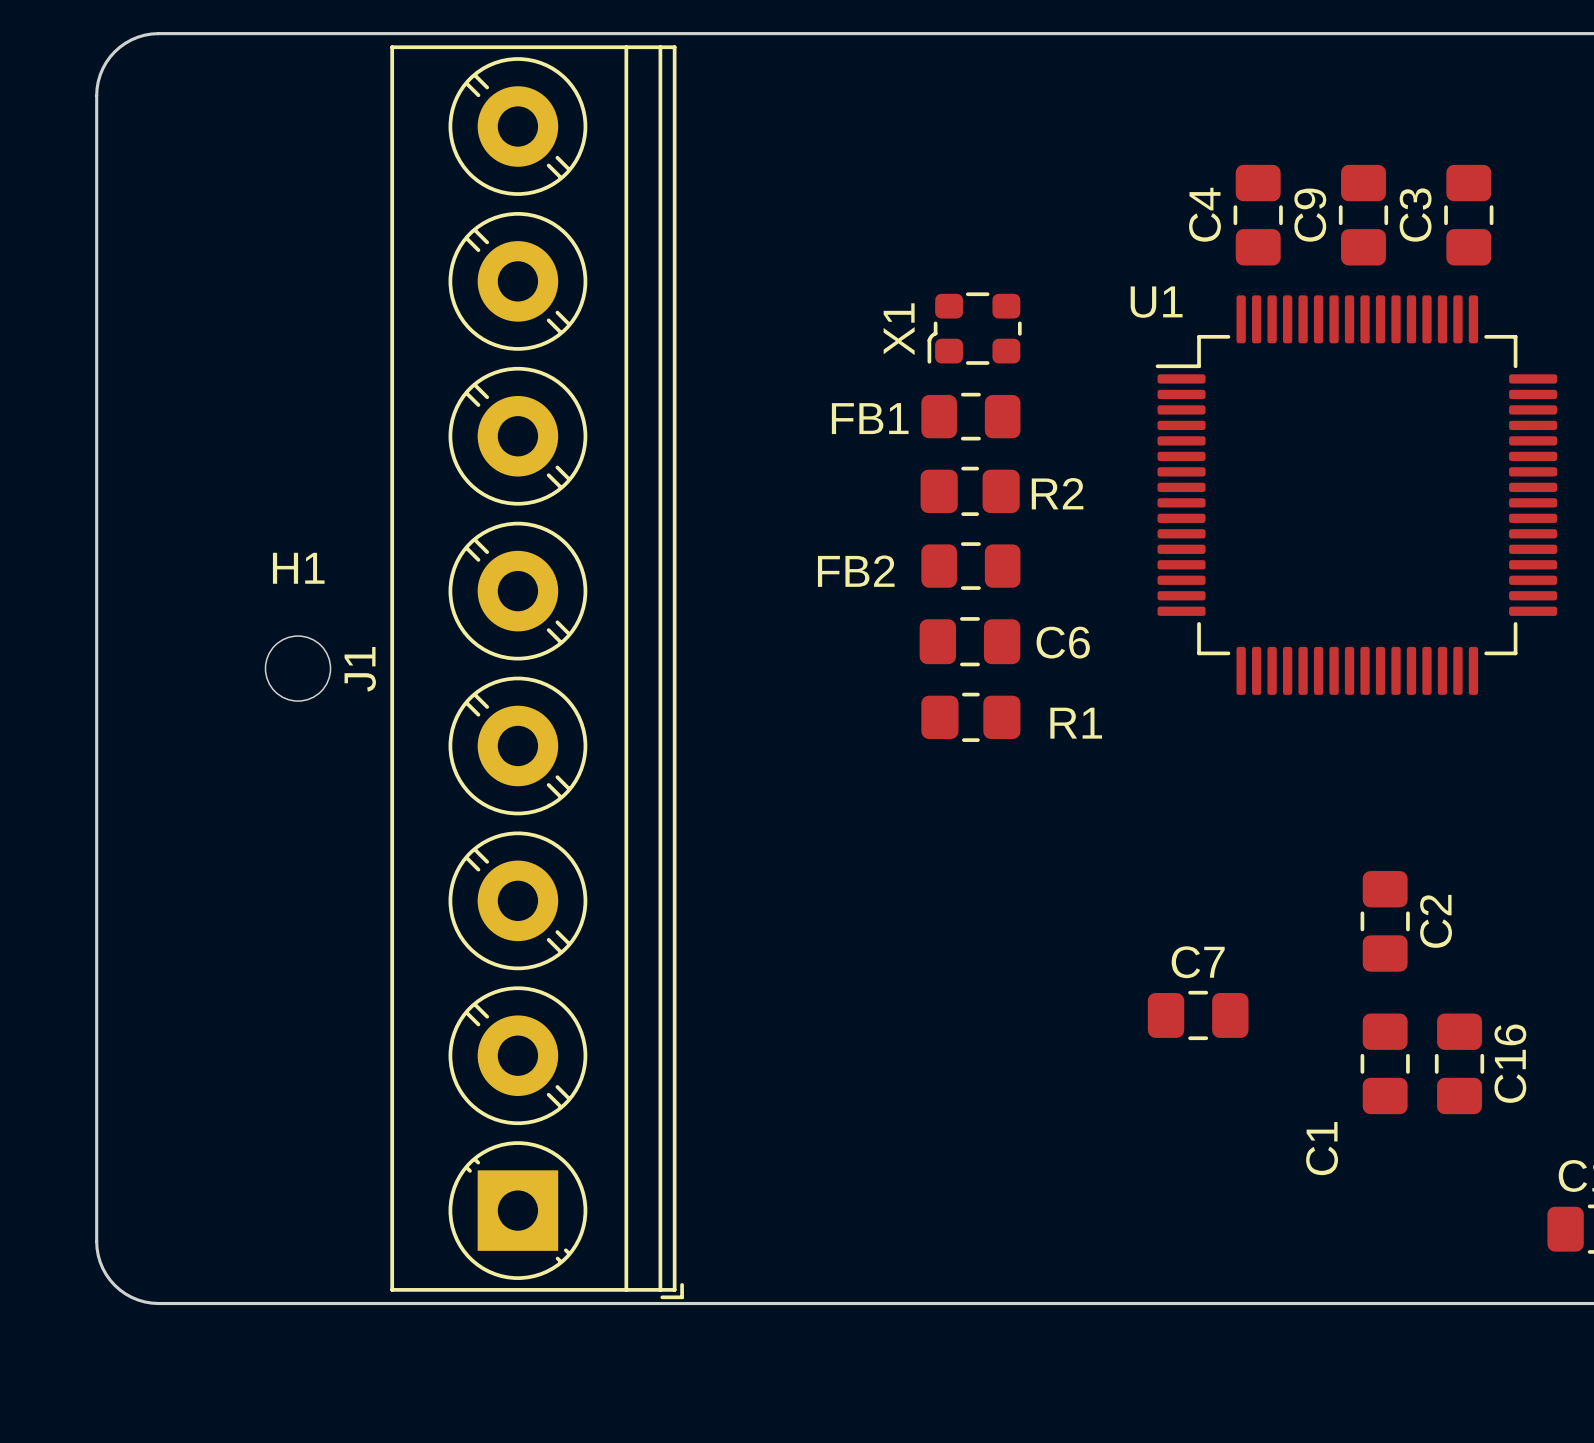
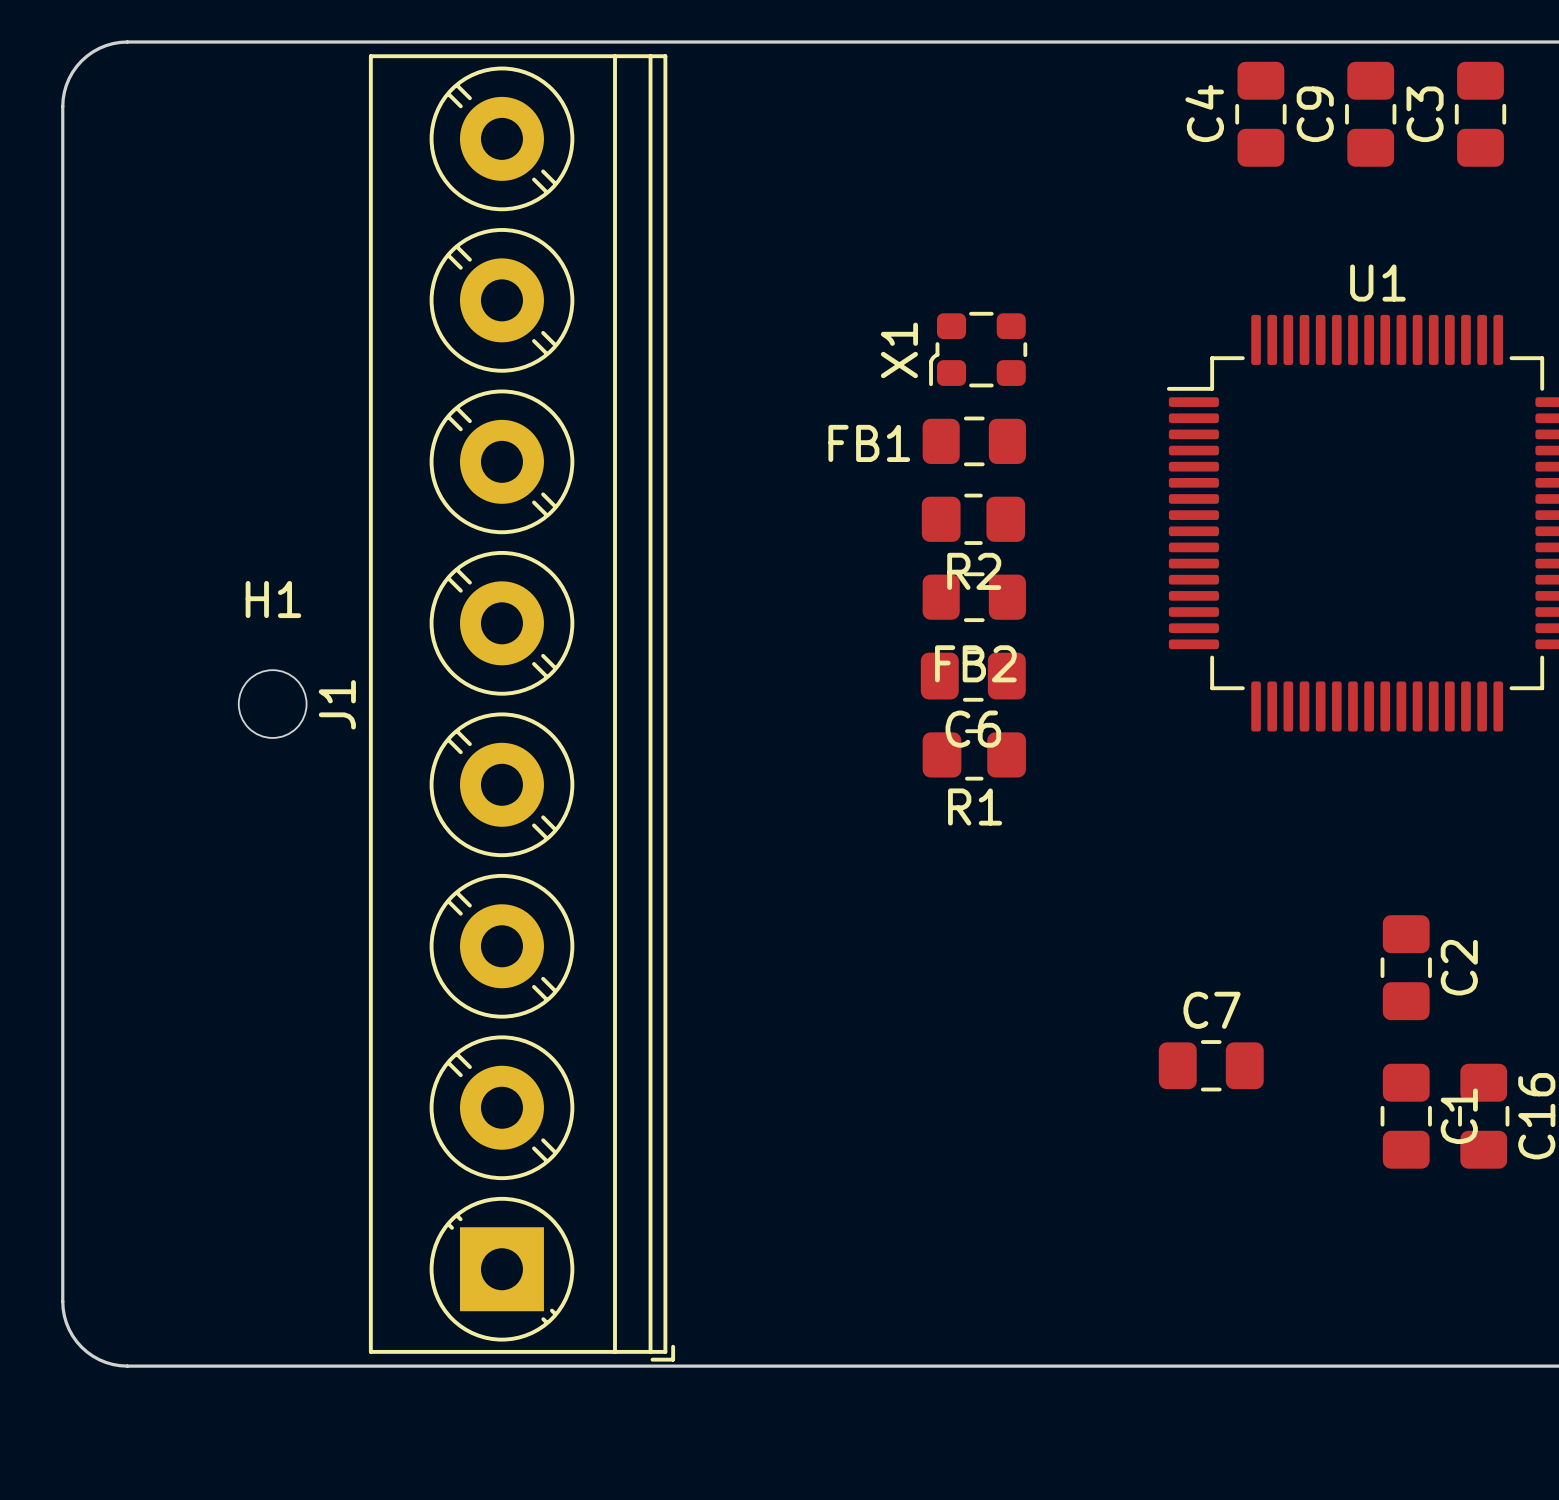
C4 position: (1258, 215) -> (1260, 114)
C9 position: (1363, 215) -> (1370, 114)
C3 position: (1468, 215) -> (1480, 114)
U1 name position: U1 (1156, 302) -> U1 (1377, 283)
R2 name position: R2 (1057, 493) -> R2 (974, 571)
FB2 name position: FB2 (856, 571) -> FB2 (975, 663)
C6 name position: C6 (1063, 642) -> C6 (973, 729)
R1 name position: R1 (1076, 723) -> R1 (975, 807)
C1 name position: C1 (1322, 1148) -> C1 (1459, 1116)

